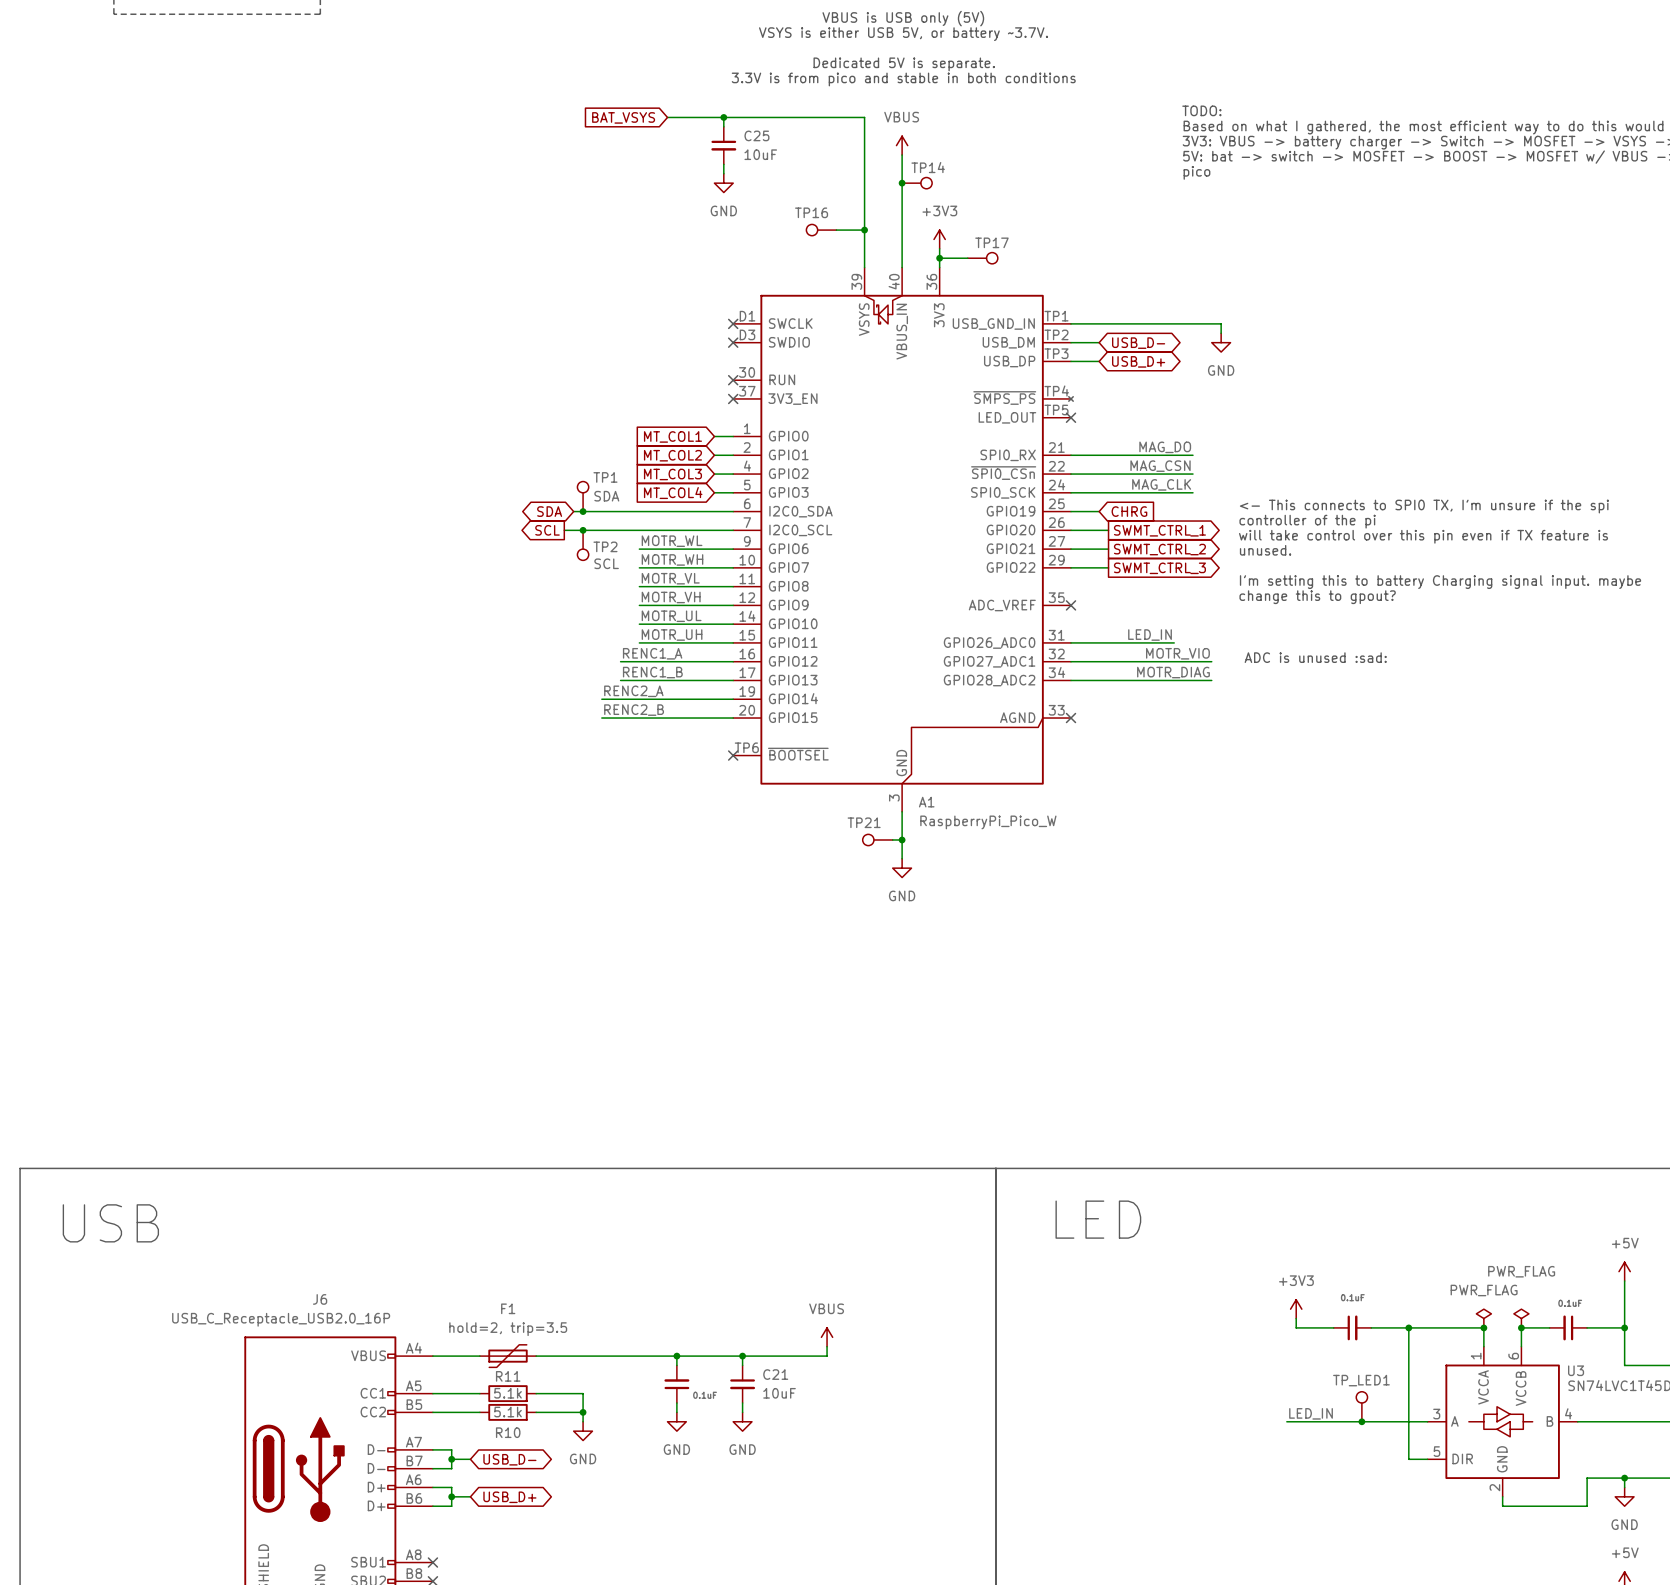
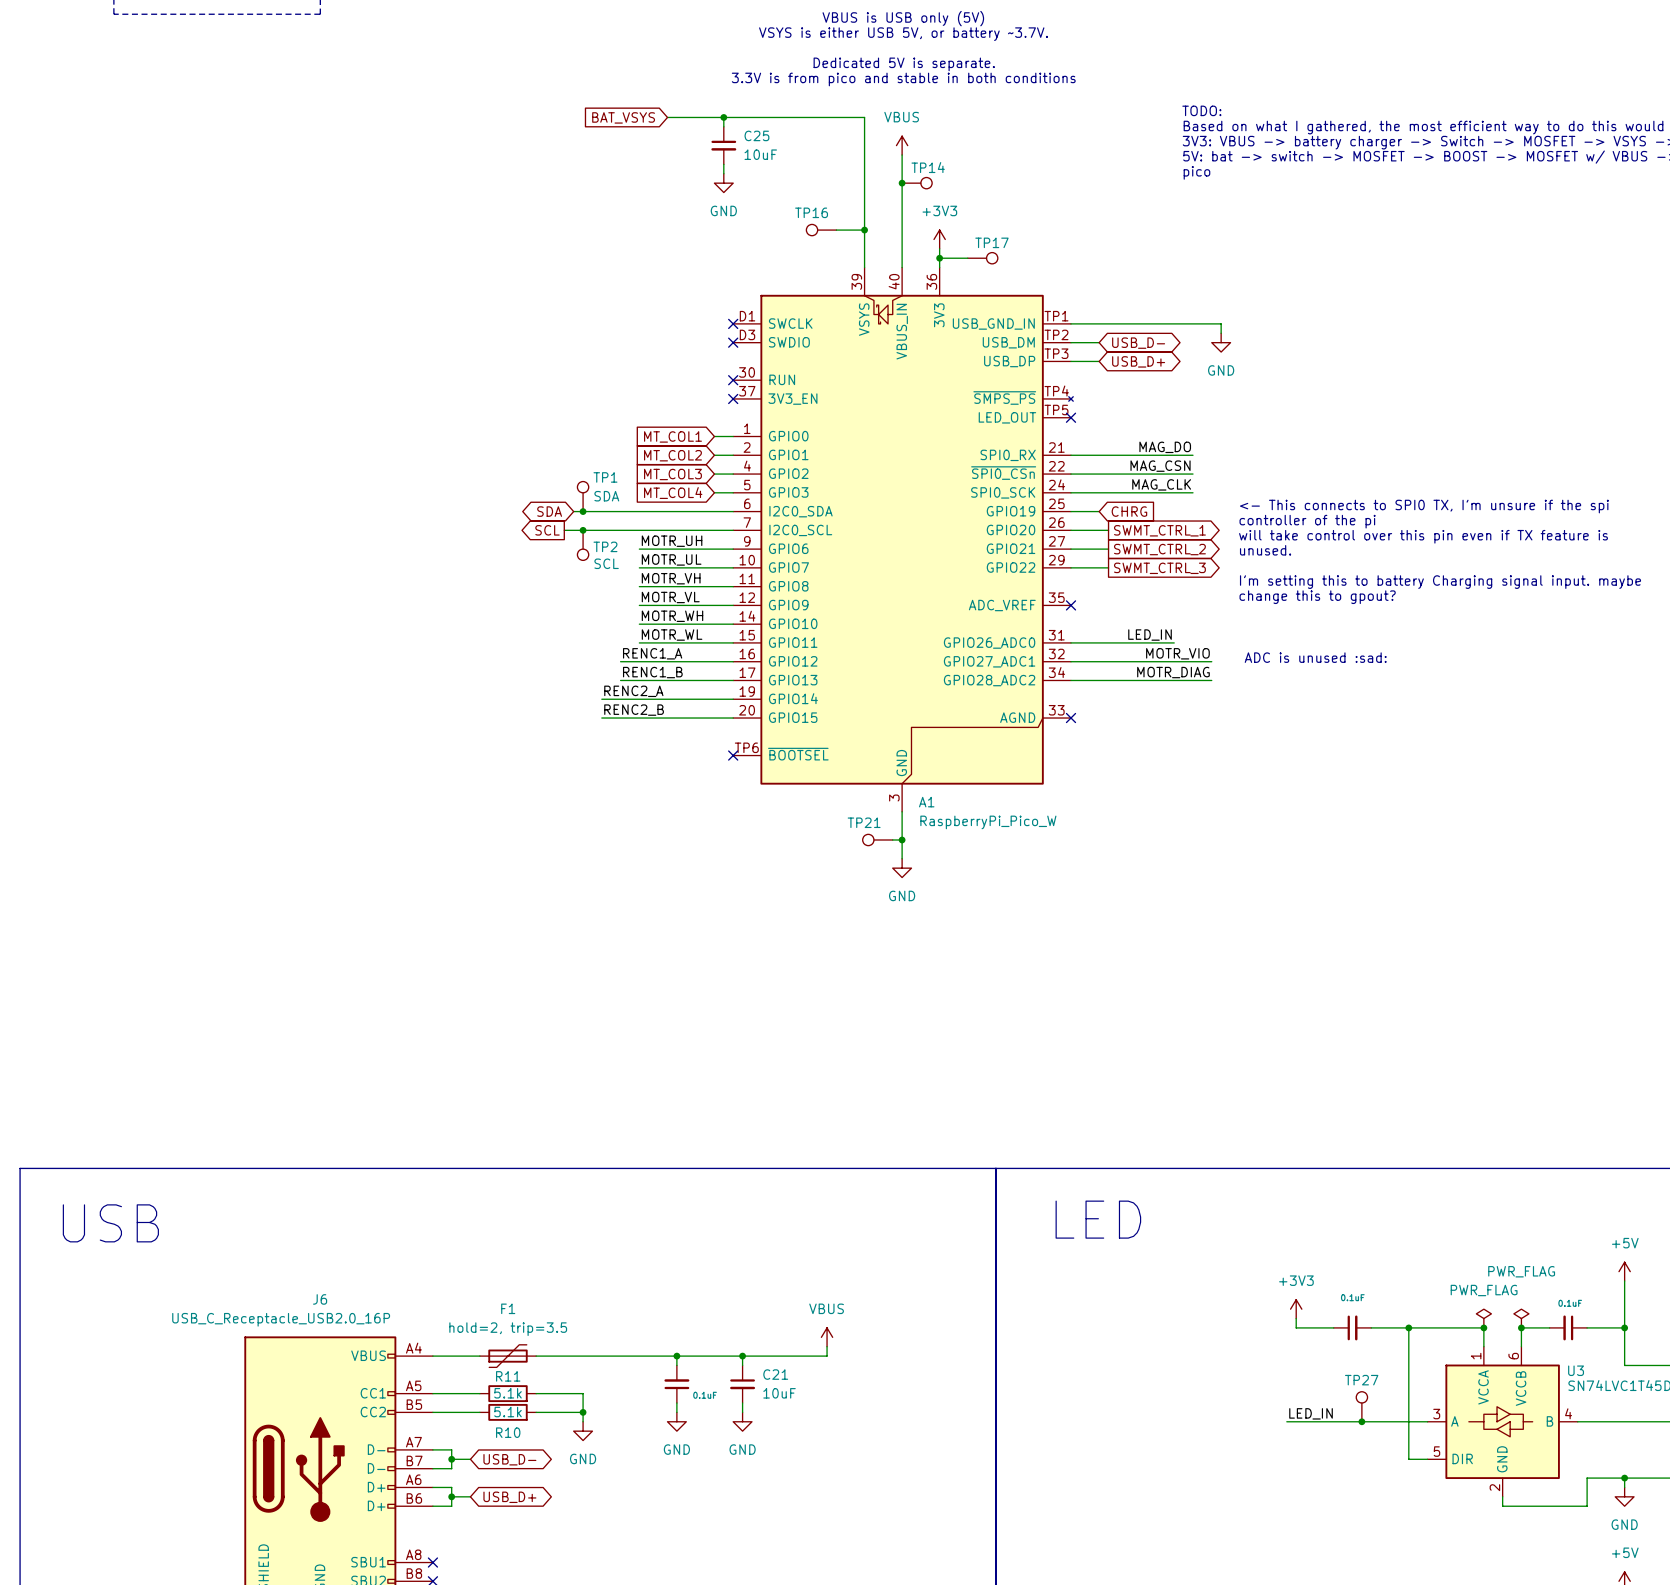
label: MOTR_WL (672, 541) -> MOTR_UH (672, 541)
label: MOTR_WH (672, 559) -> MOTR_UL (671, 559)
label: MOTR_VL (670, 578) -> MOTR_VH (671, 578)
label: MOTR_VH (671, 597) -> MOTR_VL (670, 597)
label: MOTR_UL (671, 616) -> MOTR_WH (672, 616)
label: MOTR_UH (672, 635) -> MOTR_WL (672, 635)
TP_LED1 name: TP_LED1 (1361, 1380) -> TP27 (1361, 1380)

